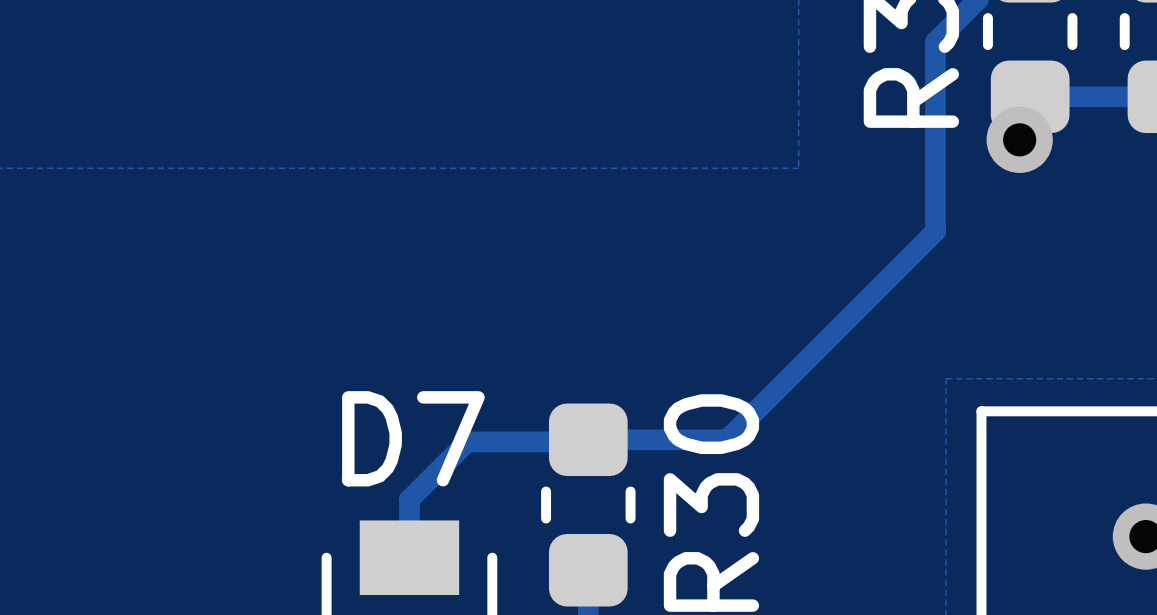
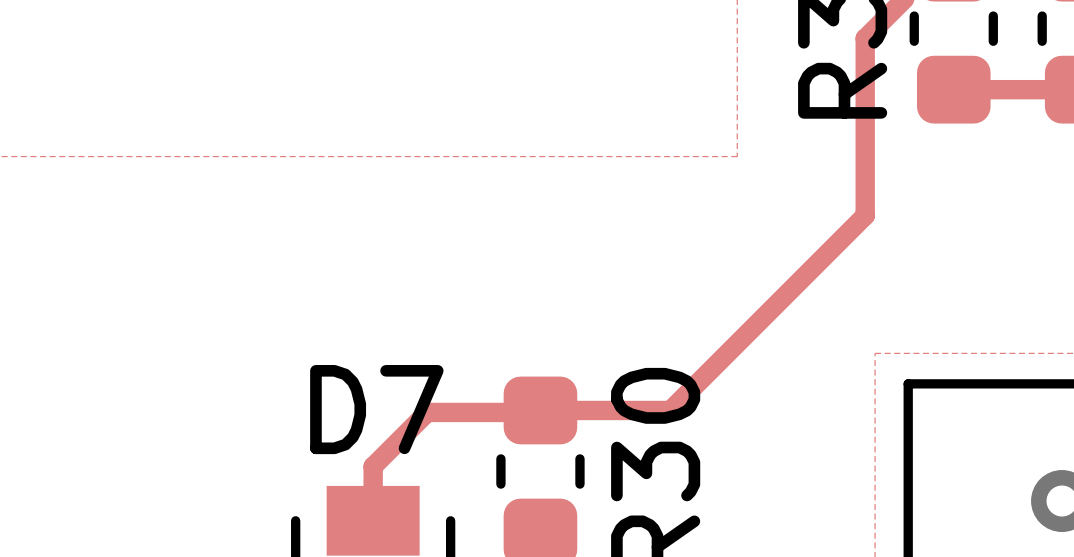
via: (1019, 139) -> none

